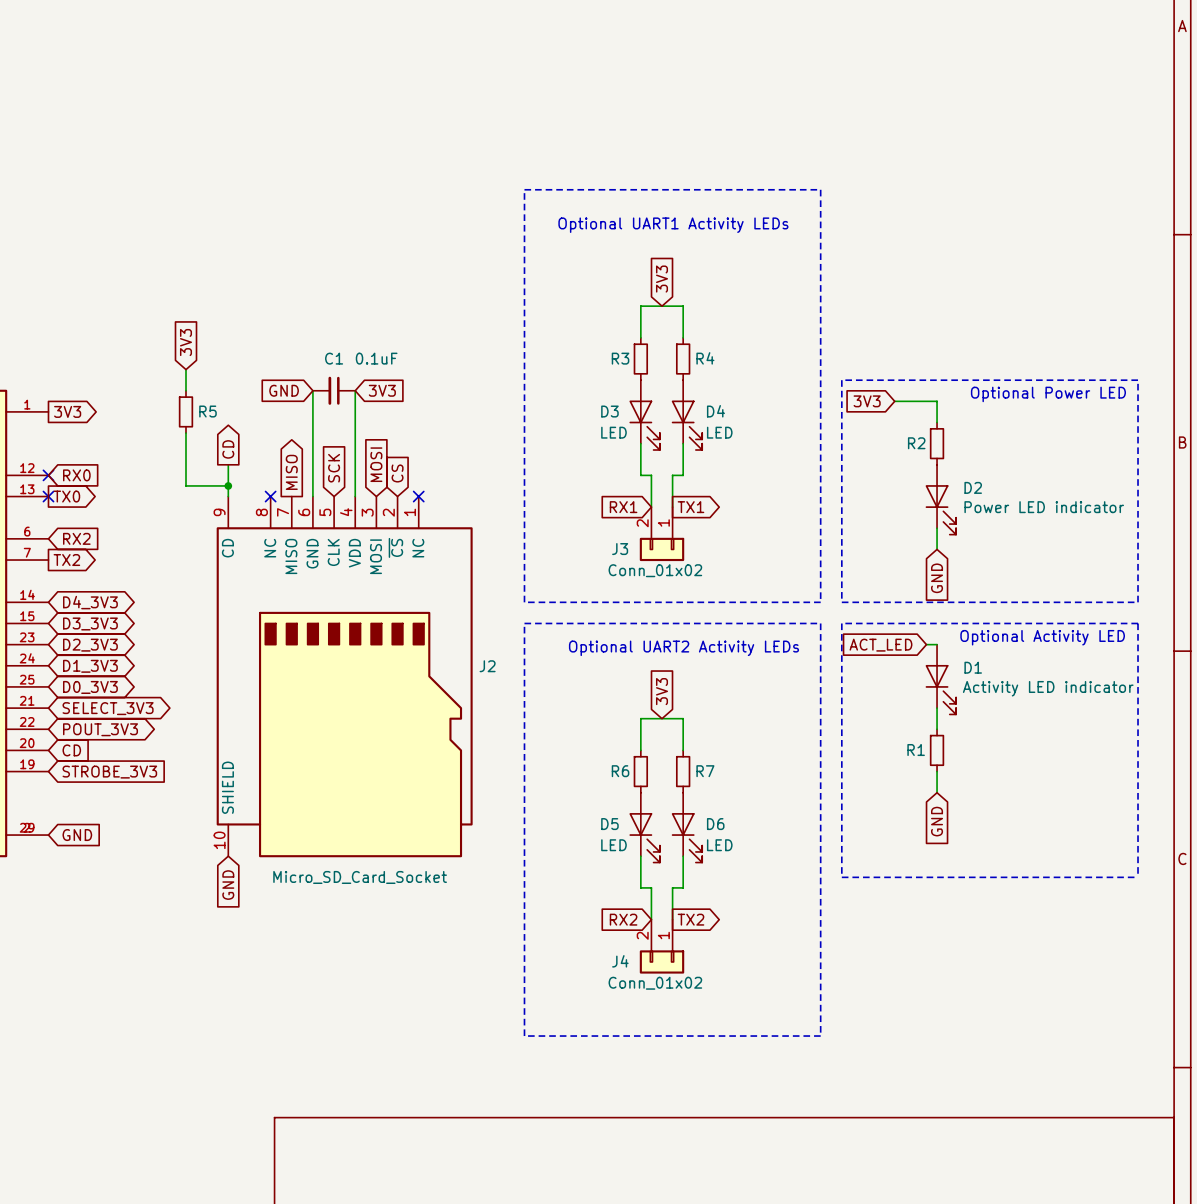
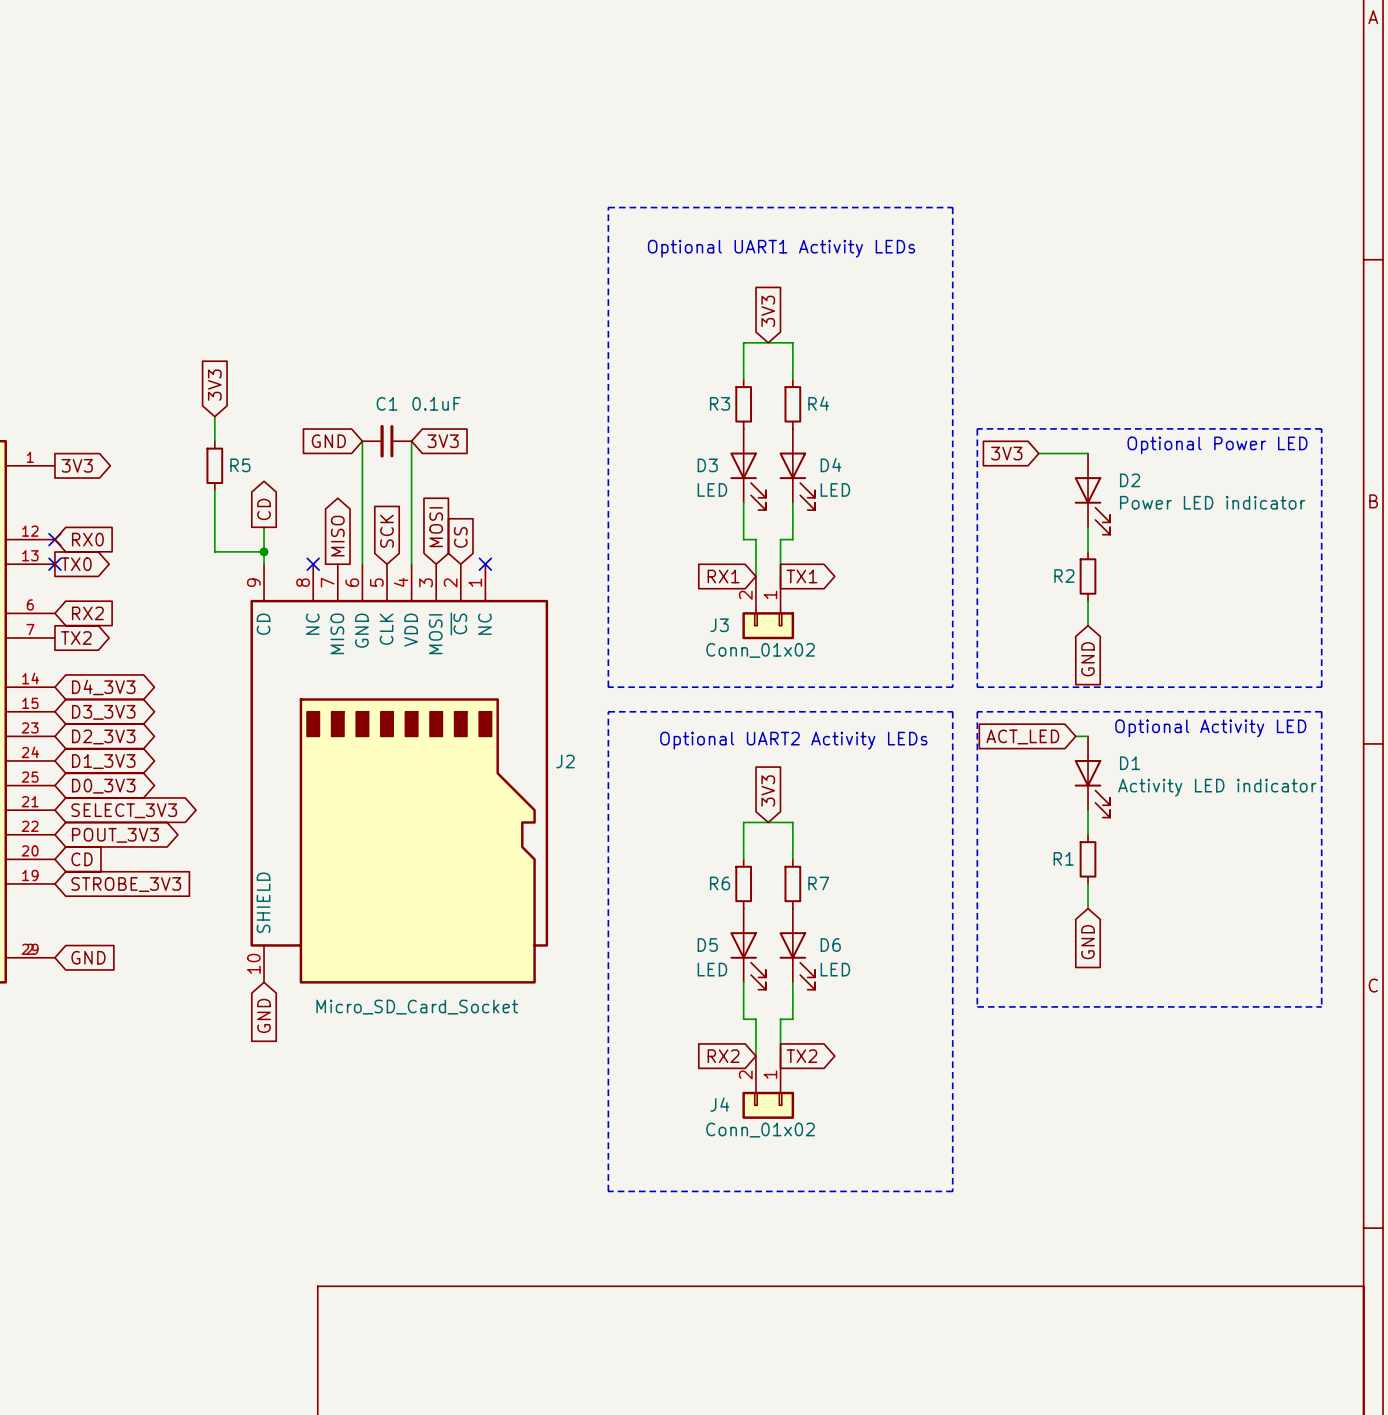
R2 position: (937, 443) -> (1088, 576)
D2 position: (940, 499) -> (1092, 494)

